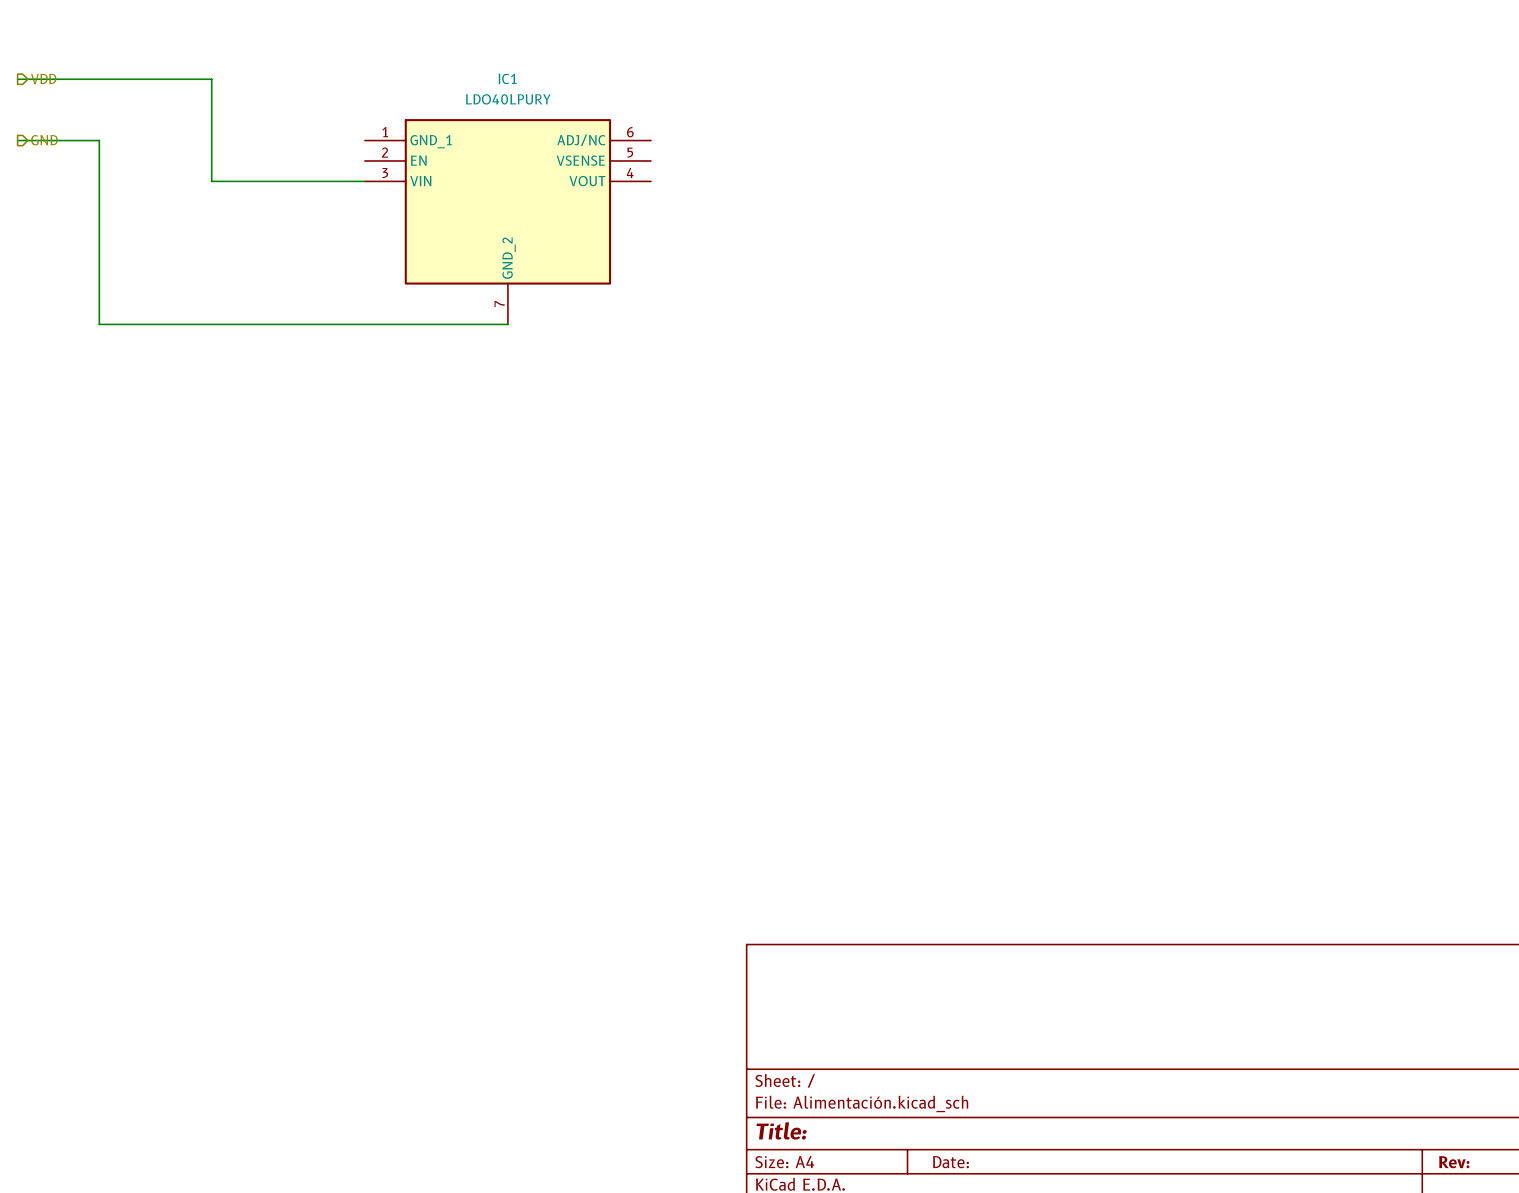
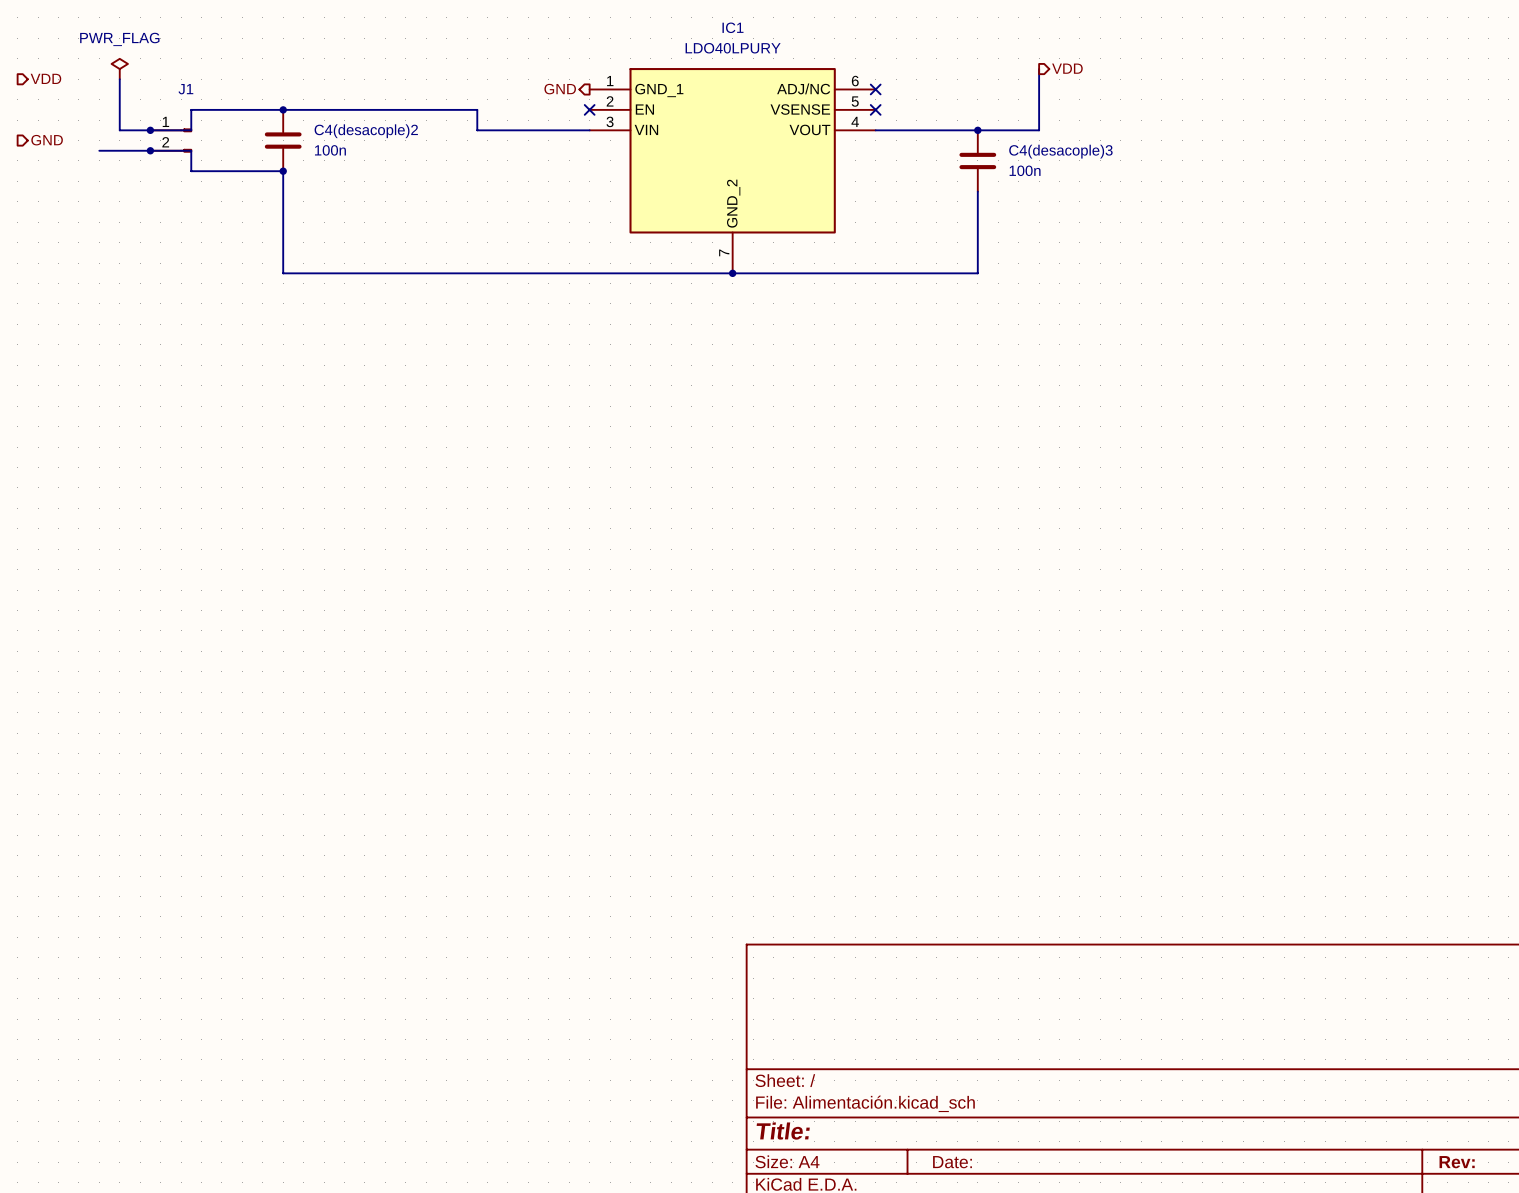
hierarchical label: none -> VDD (1067, 68)
power symbol: none -> PWR_FLAG (119, 69)
wire: none -> (1039, 69) (1039, 130) (875, 130)
wire: (17, 79) (211, 79) (211, 181) (364, 181) -> none
wire: none -> (119, 79) (119, 130) (191, 130) (191, 109) (477, 109) (477, 130) (589, 130)
hierarchical label: none -> GND (560, 89)
no-connect mark: none -> (875, 89)
junction: none -> (283, 109)
no-connect mark: none -> (589, 109)
no-connect mark: none -> (875, 109)
junction: none -> (150, 130)
junction: none -> (977, 130)
wire: (17, 140) (99, 140) (99, 324) (507, 324) -> none
J1: none -> (171, 140)
C4(desacople)2: none -> 100n (283, 140)
wire: none -> (99, 150) (191, 150) (191, 171) (283, 171) (283, 273) (977, 273) (977, 191)
junction: none -> (150, 150)
C4(desacople)3: none -> 100n (977, 160)
junction: none -> (283, 171)
IC1 position: (507, 221) -> (732, 170)
junction: none -> (732, 273)

